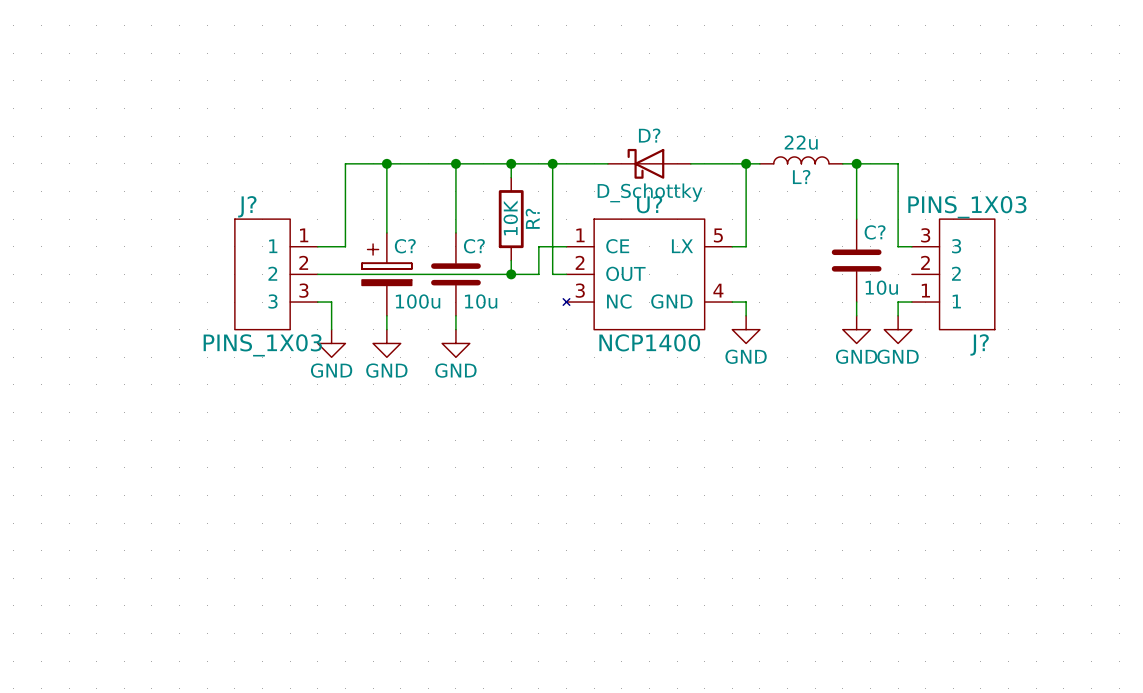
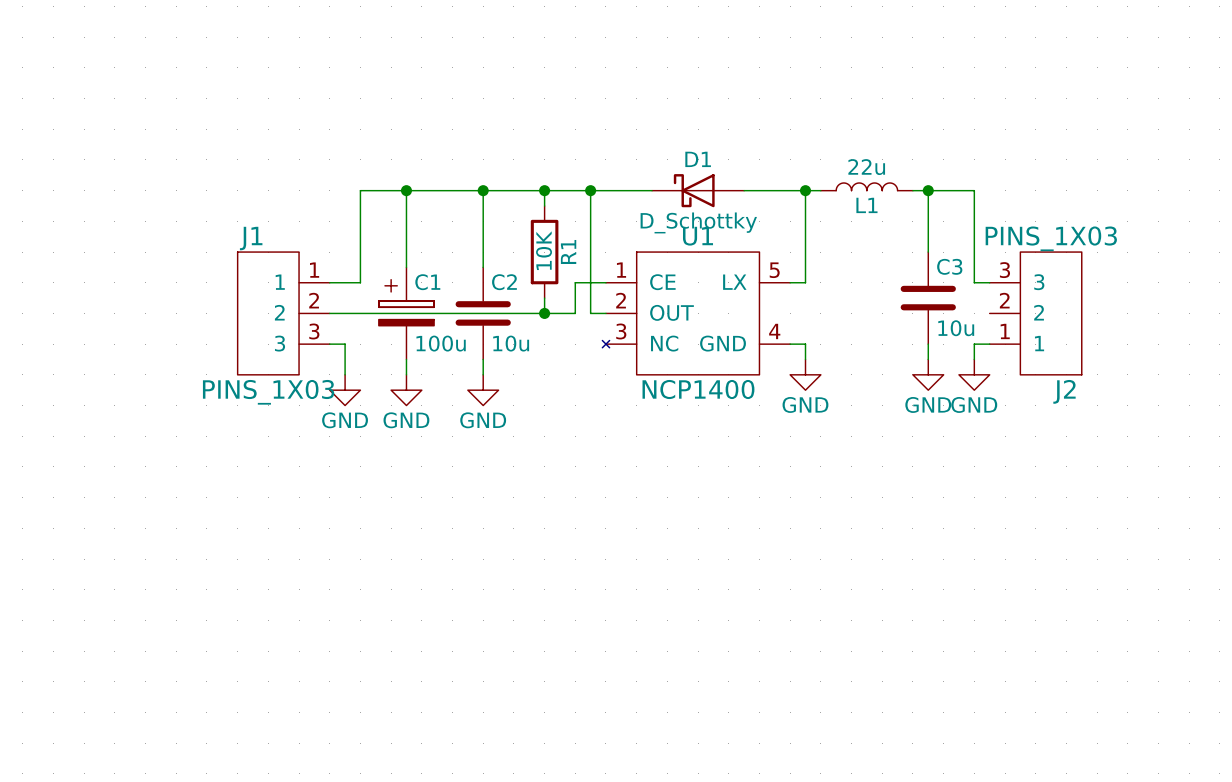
D? name: D? (649, 135) -> D1 (698, 159)
L? name: L? (801, 177) -> L1 (866, 205)
U? name: U? (649, 204) -> U1 (698, 236)
J? name: J? (247, 206) -> J1 (251, 238)
R? name: R? (532, 218) -> R1 (568, 251)
C? name: C? (875, 232) -> C3 (949, 266)
C? name: C? (405, 246) -> C1 (427, 282)
C? name: C? (474, 246) -> C2 (504, 282)
J? name: J? (979, 344) -> J2 (1064, 391)

